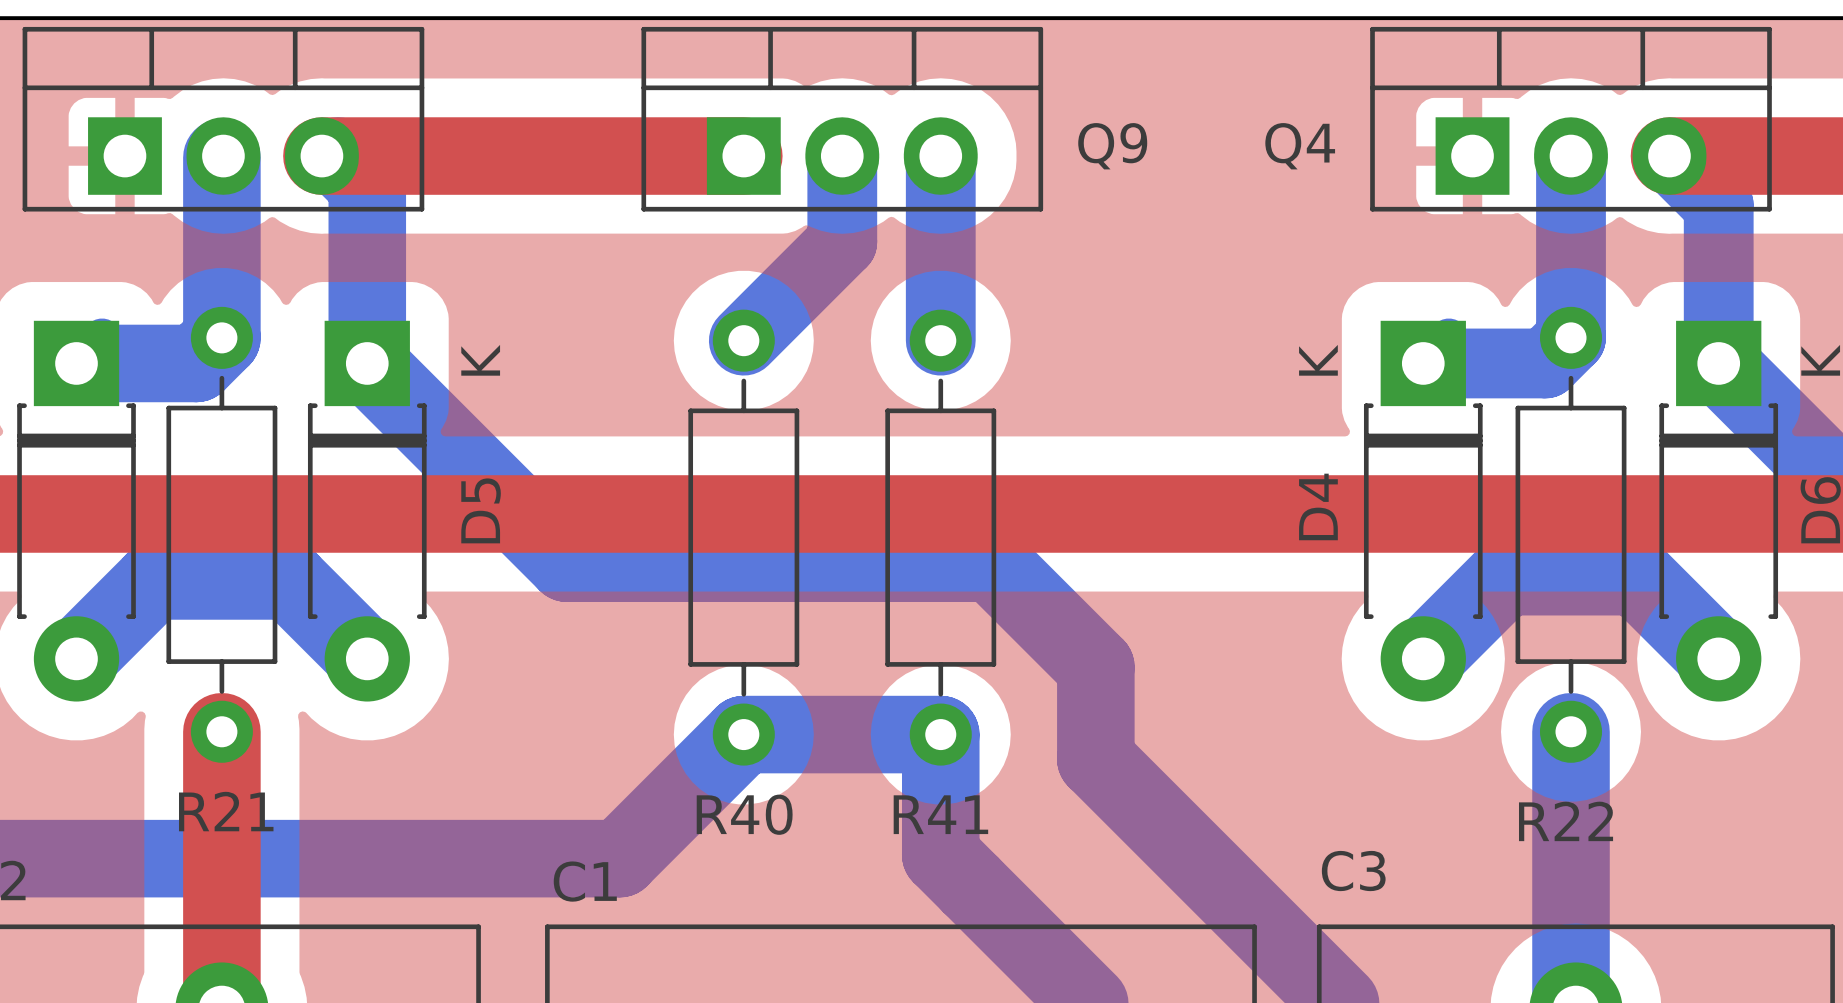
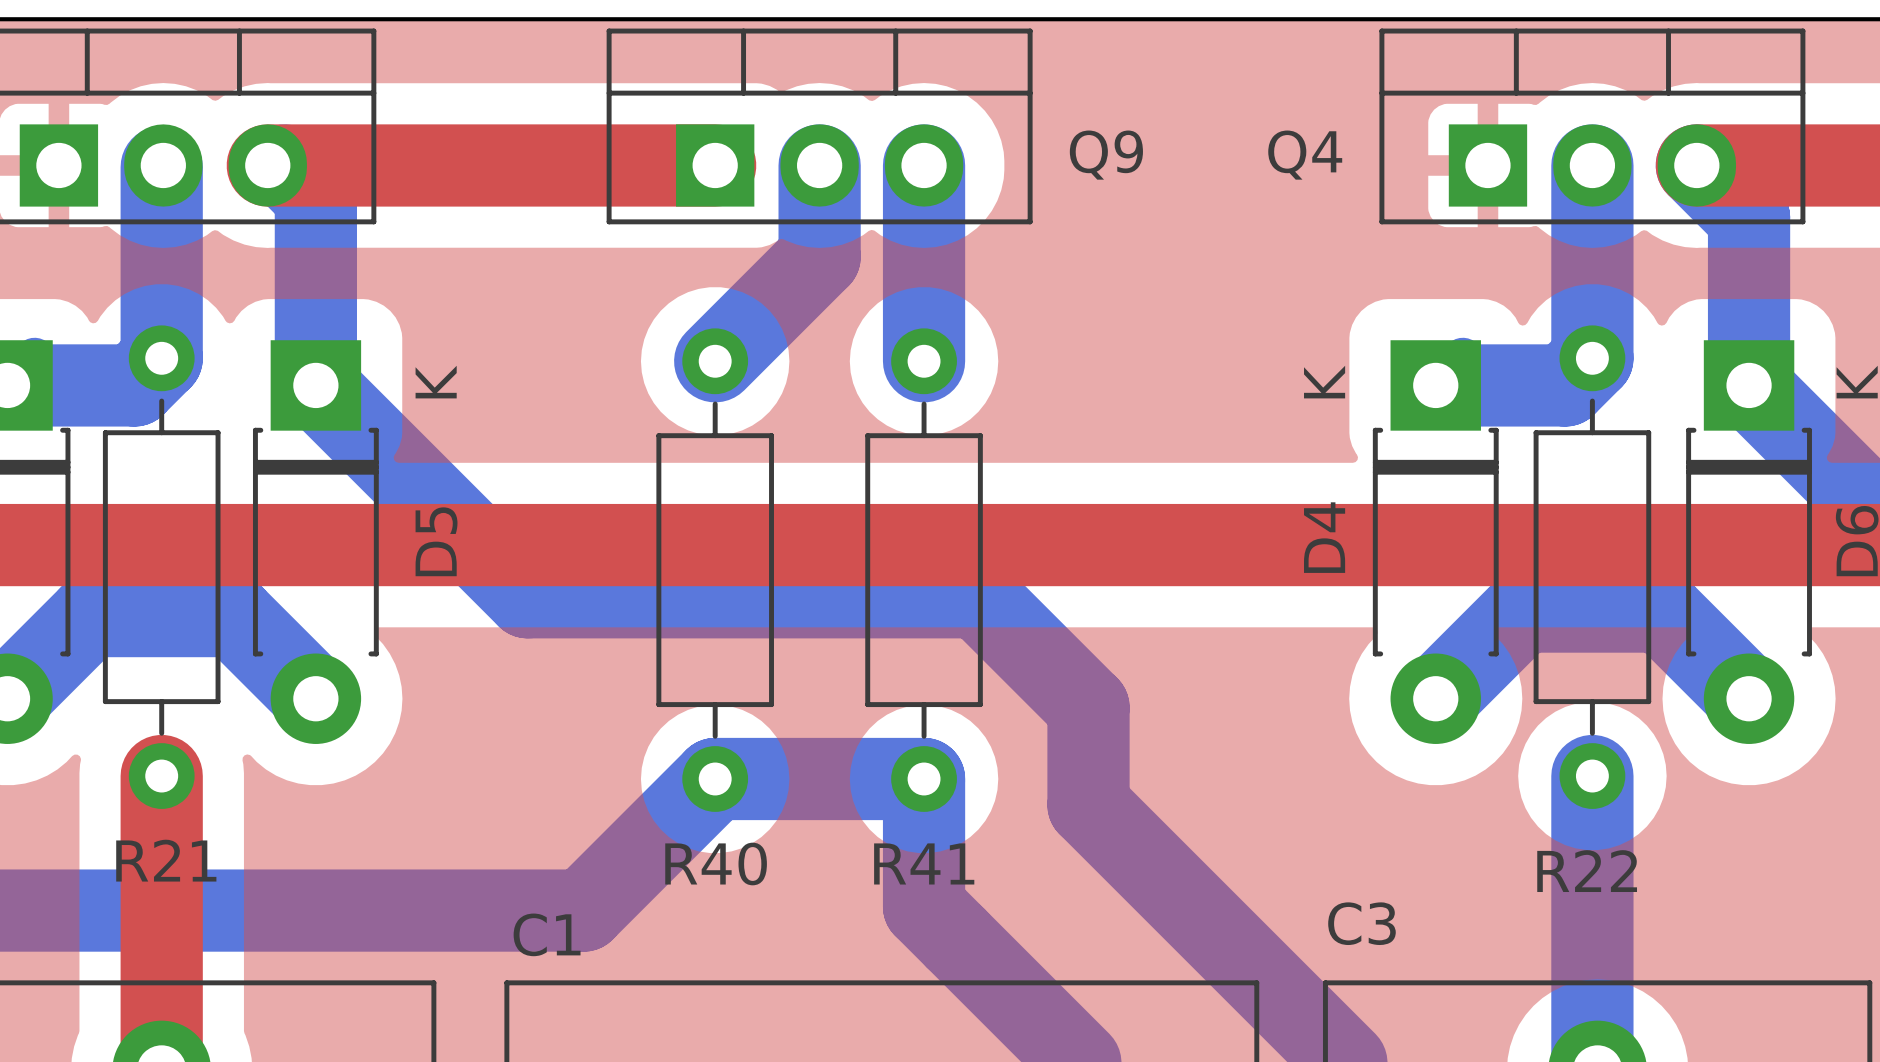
bottom track width: thin (842, 156) (842, 242) (743, 340) -> thick (819, 165) (819, 256) (715, 361)
bottom track width: thin (940, 156) (940, 340) -> thick (924, 165) (924, 361)
bottom track width: thin (1571, 156) (1571, 337) (1545, 363) (1423, 363) -> thick (1592, 165) (1592, 358) (1565, 385) (1435, 385)
bottom track width: thin (1669, 156) (1718, 205) (1718, 363) -> thick (1696, 165) (1749, 217) (1749, 385)

